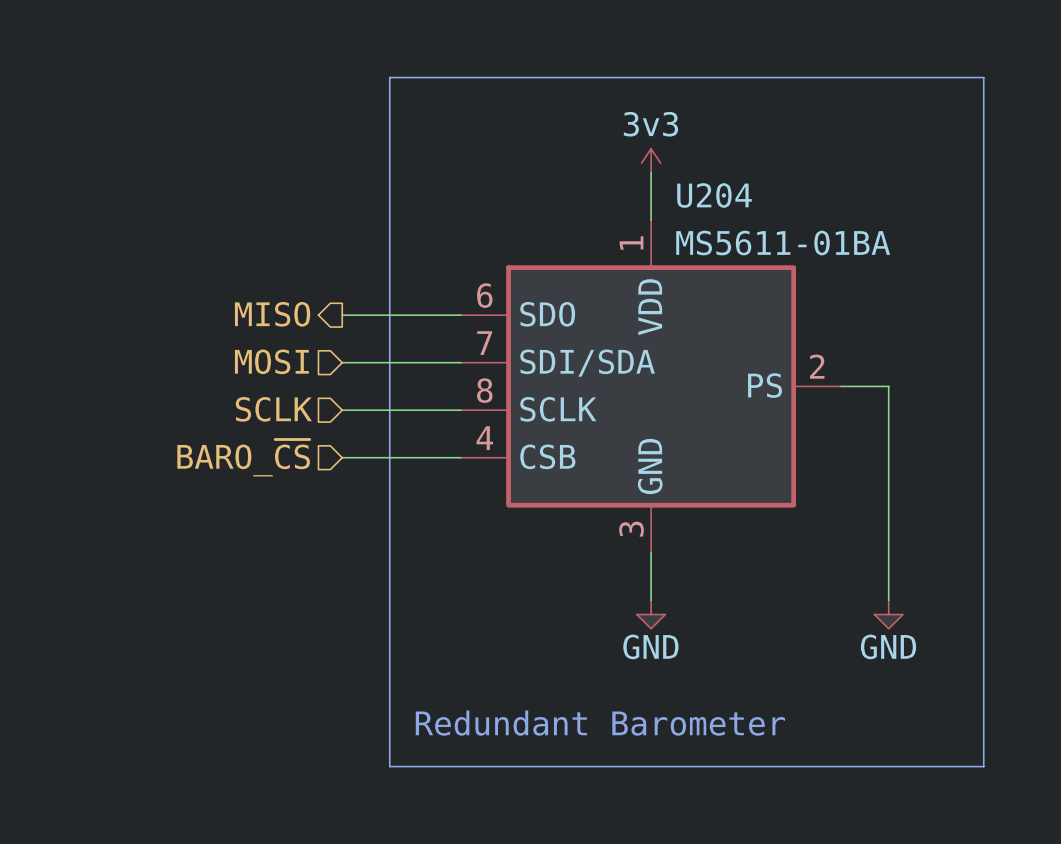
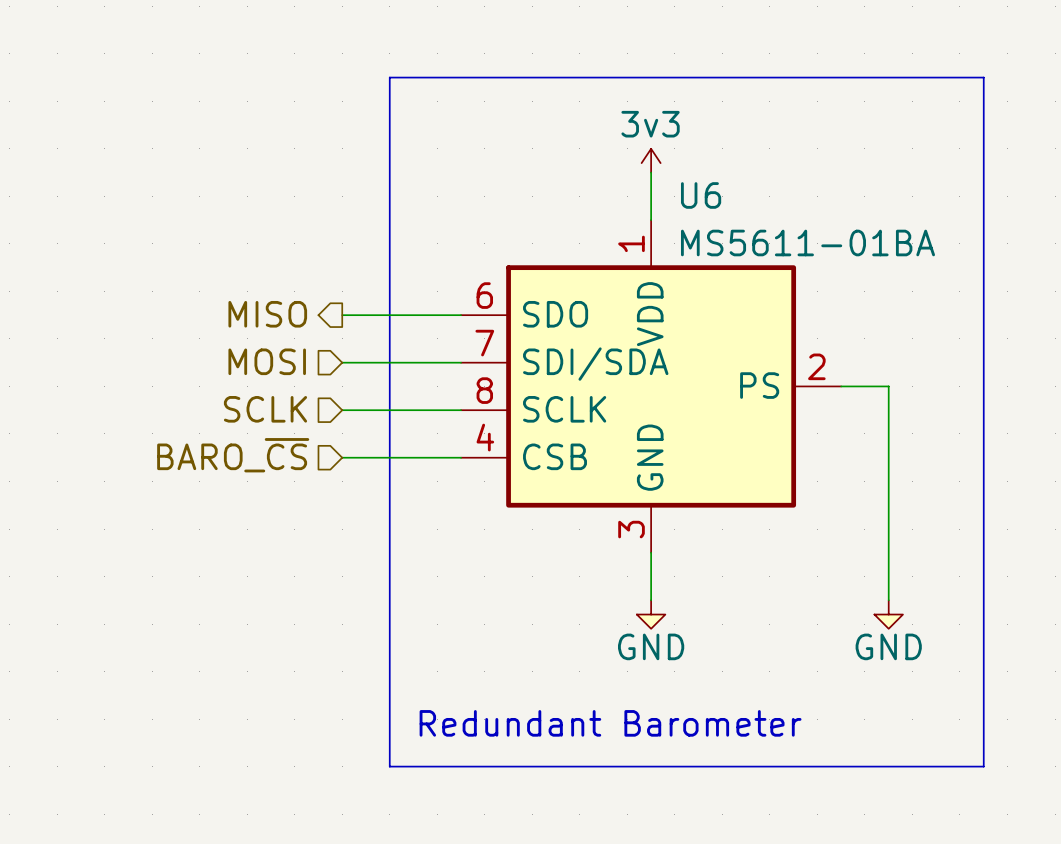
U204 name: U204 (714, 195) -> U6 (701, 195)

